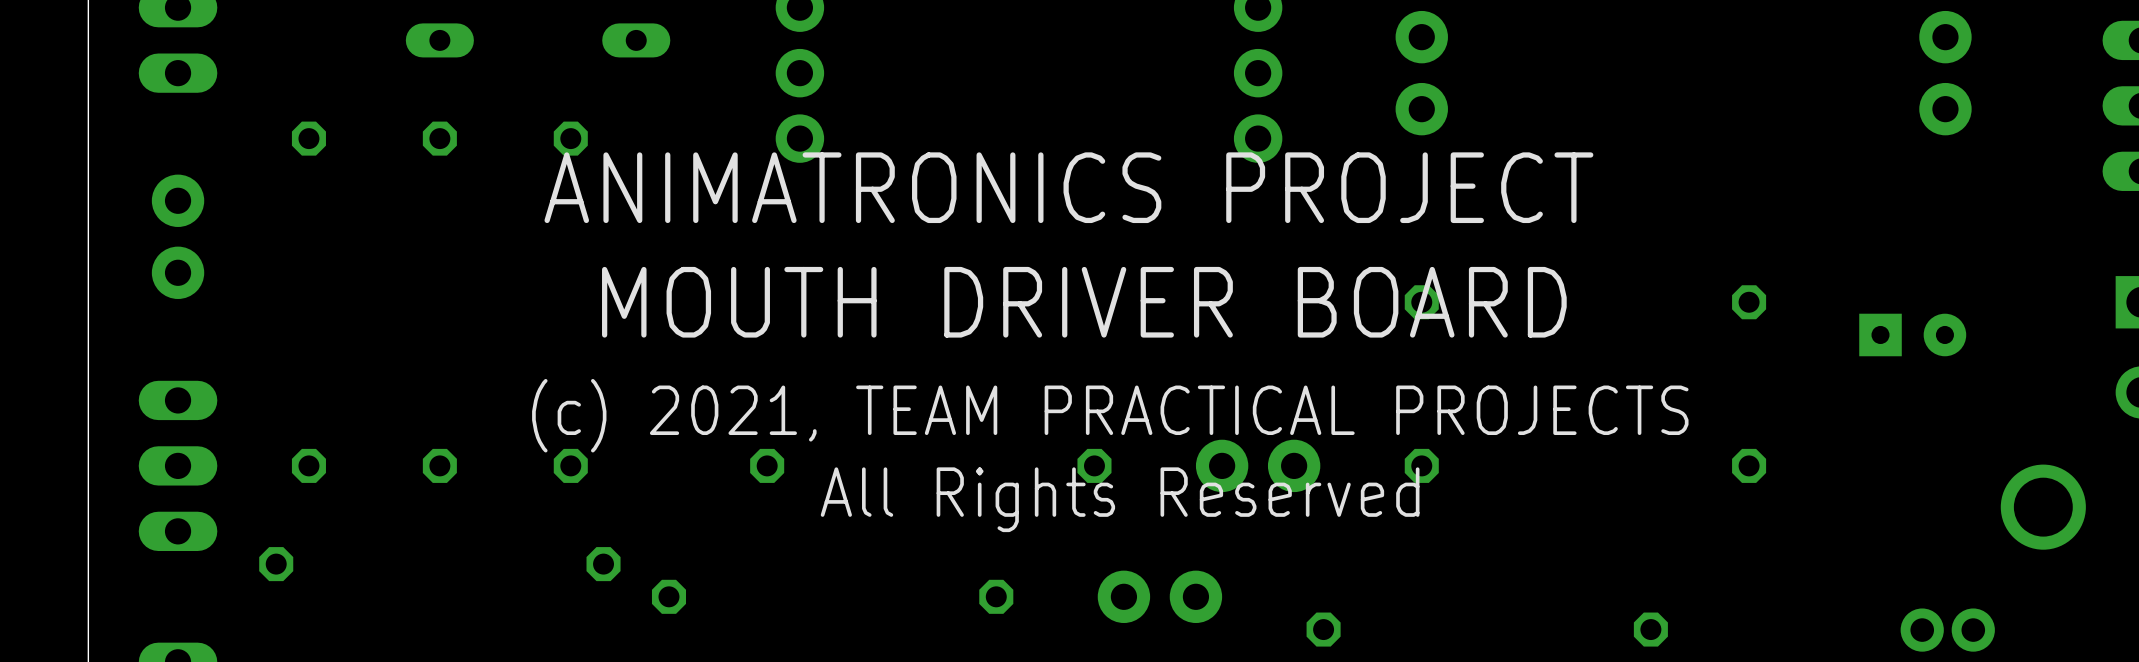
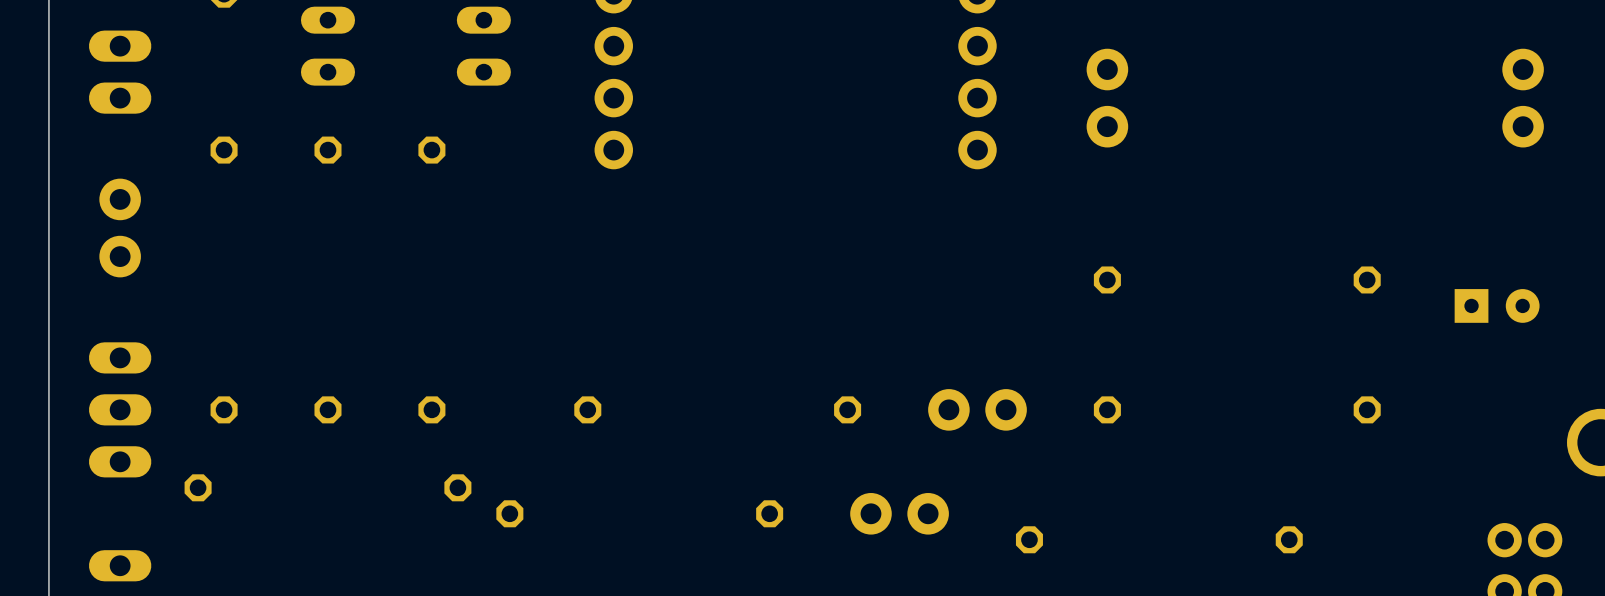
text: ANIMATRONICS PROJECT (1068, 187) -> none
text: MOUTH DRIVER BOARD (1084, 302) -> none
text: (c) 2021, TEAM PRACTICAL PROJECTS (1110, 415) -> none
text: All Rights Reserved (1120, 499) -> none

